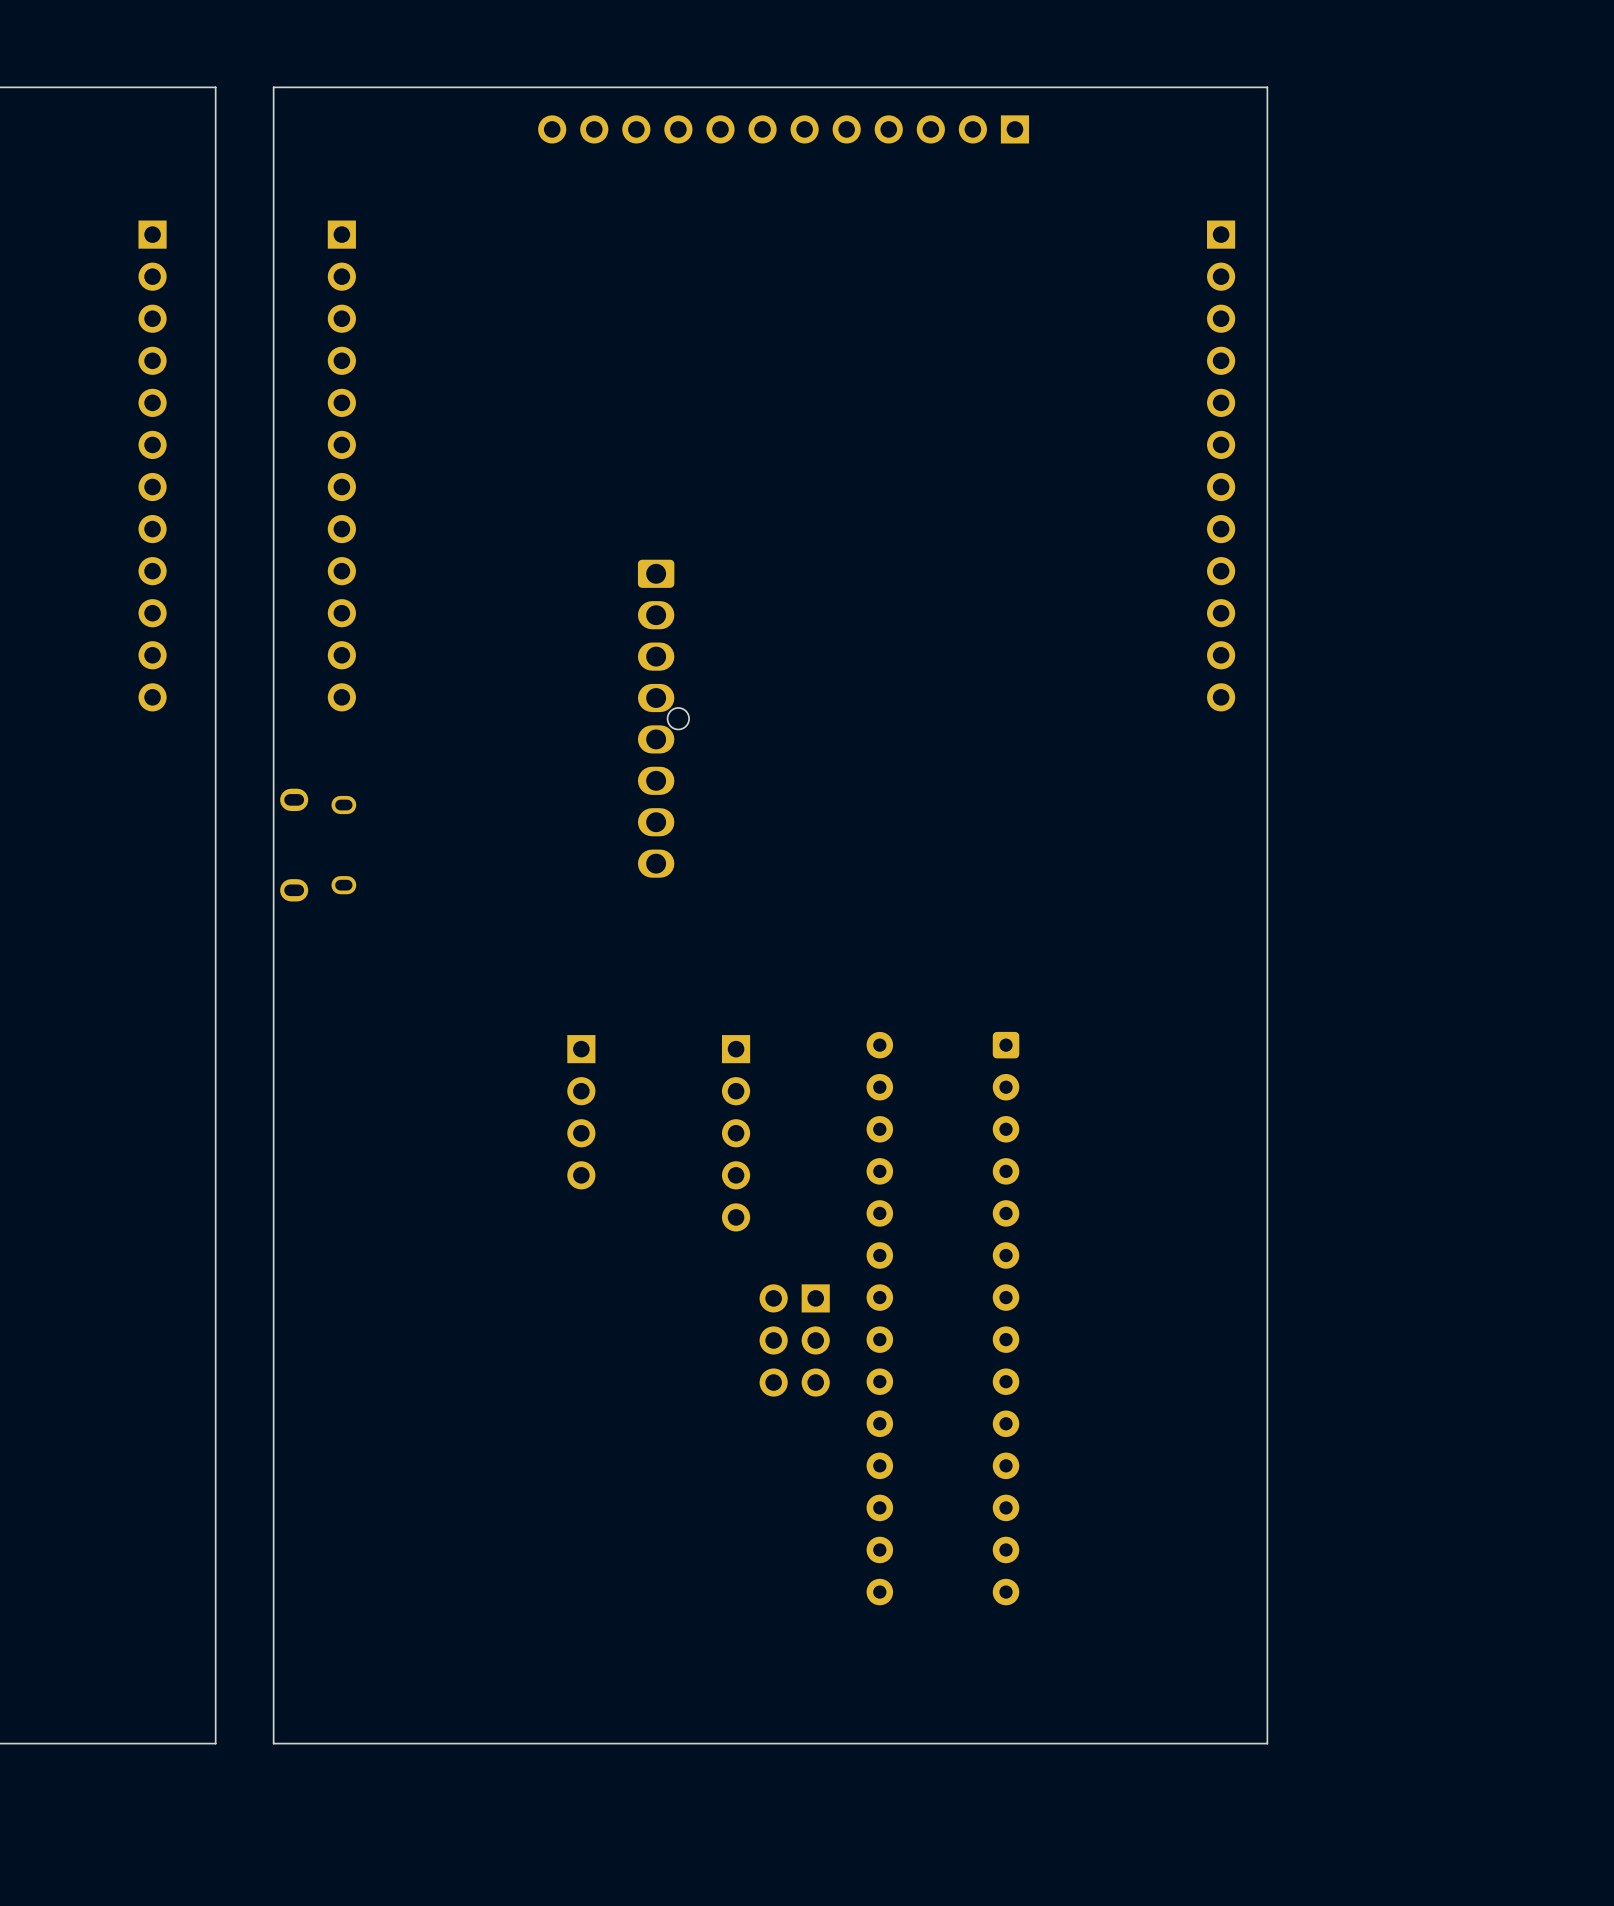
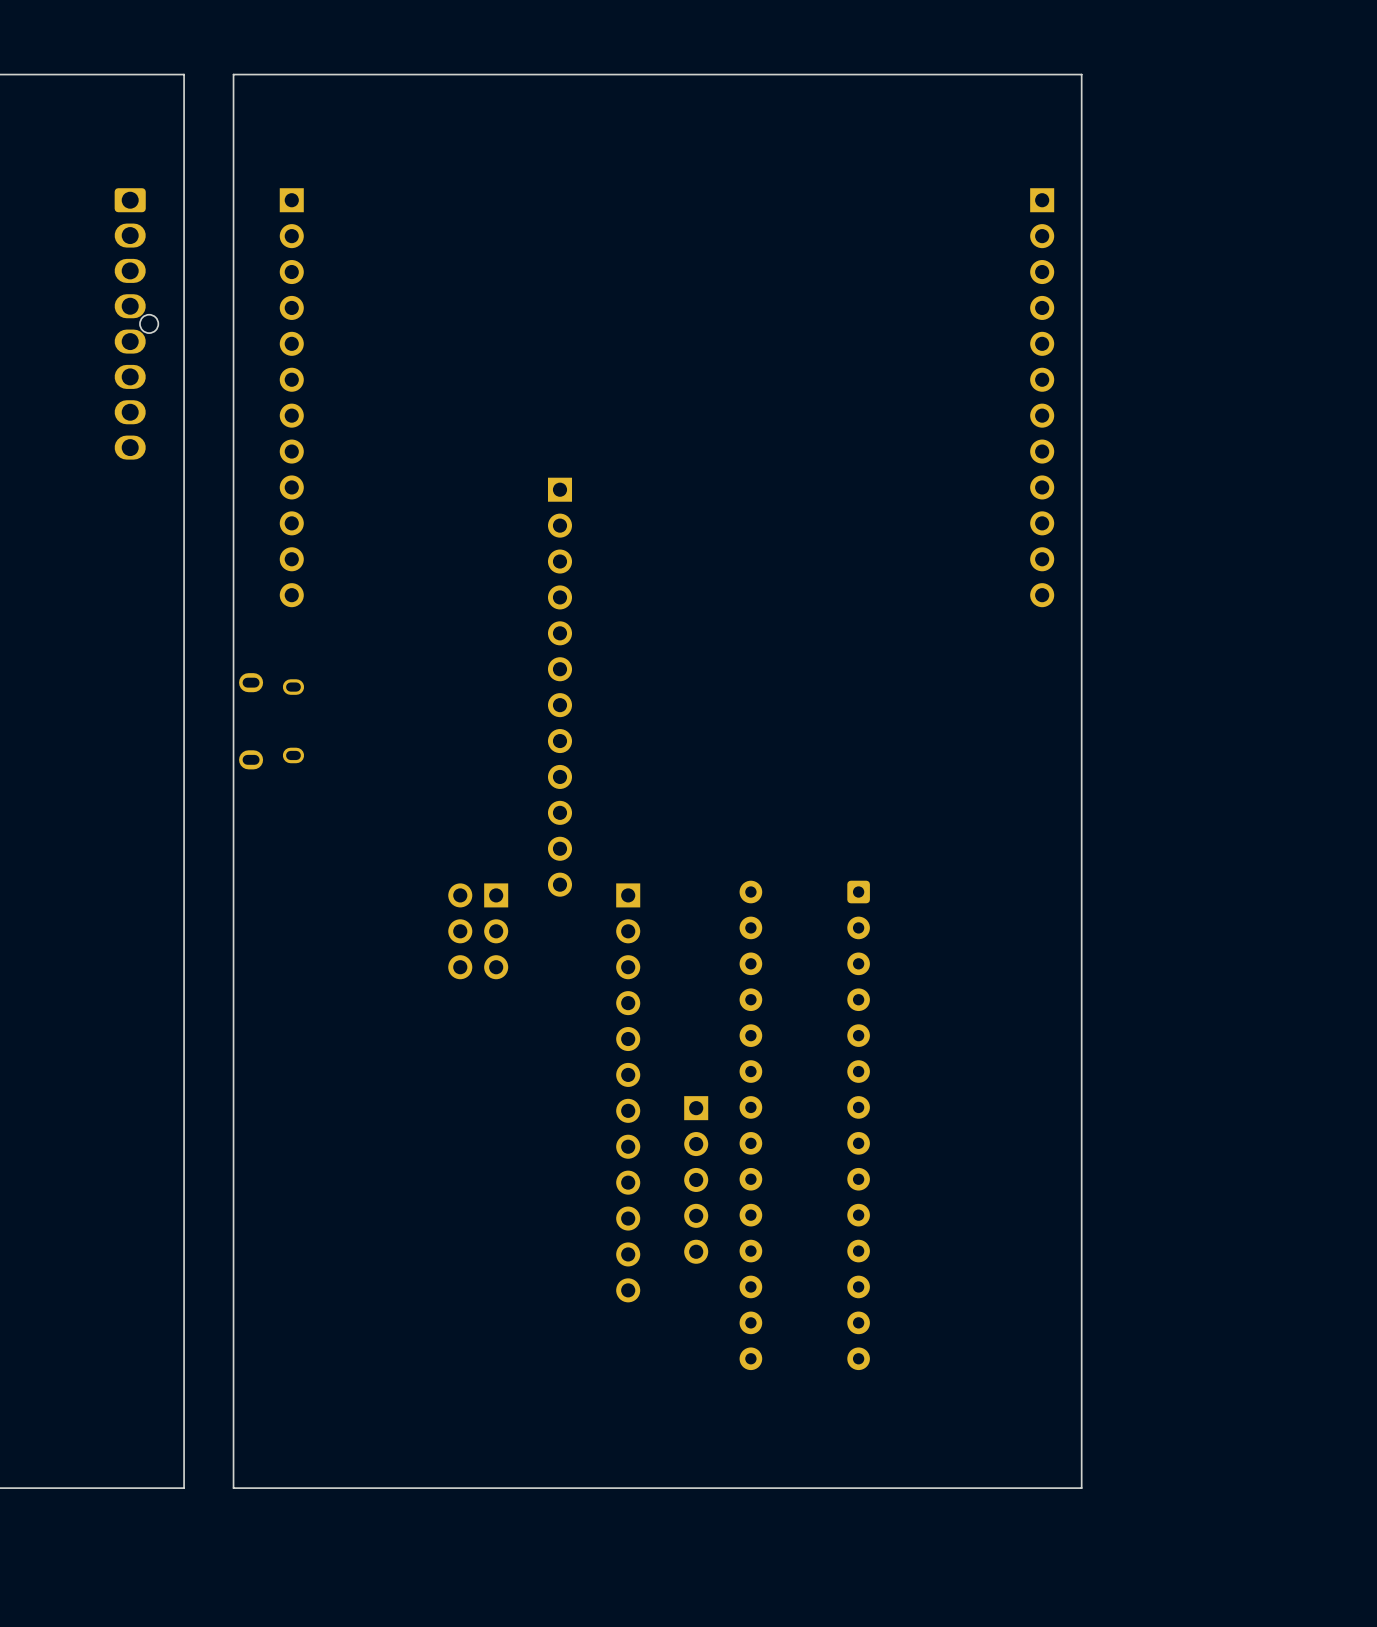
part: (783, 129) -> none
part: none -> (136, 323)
part: (152, 465) -> none
part: (663, 718) -> none
part: none -> (560, 687)
part: (581, 1112) -> none
part position: (736, 1133) -> (696, 1179)
part: none -> (628, 1092)
part position: (794, 1340) -> (478, 931)

